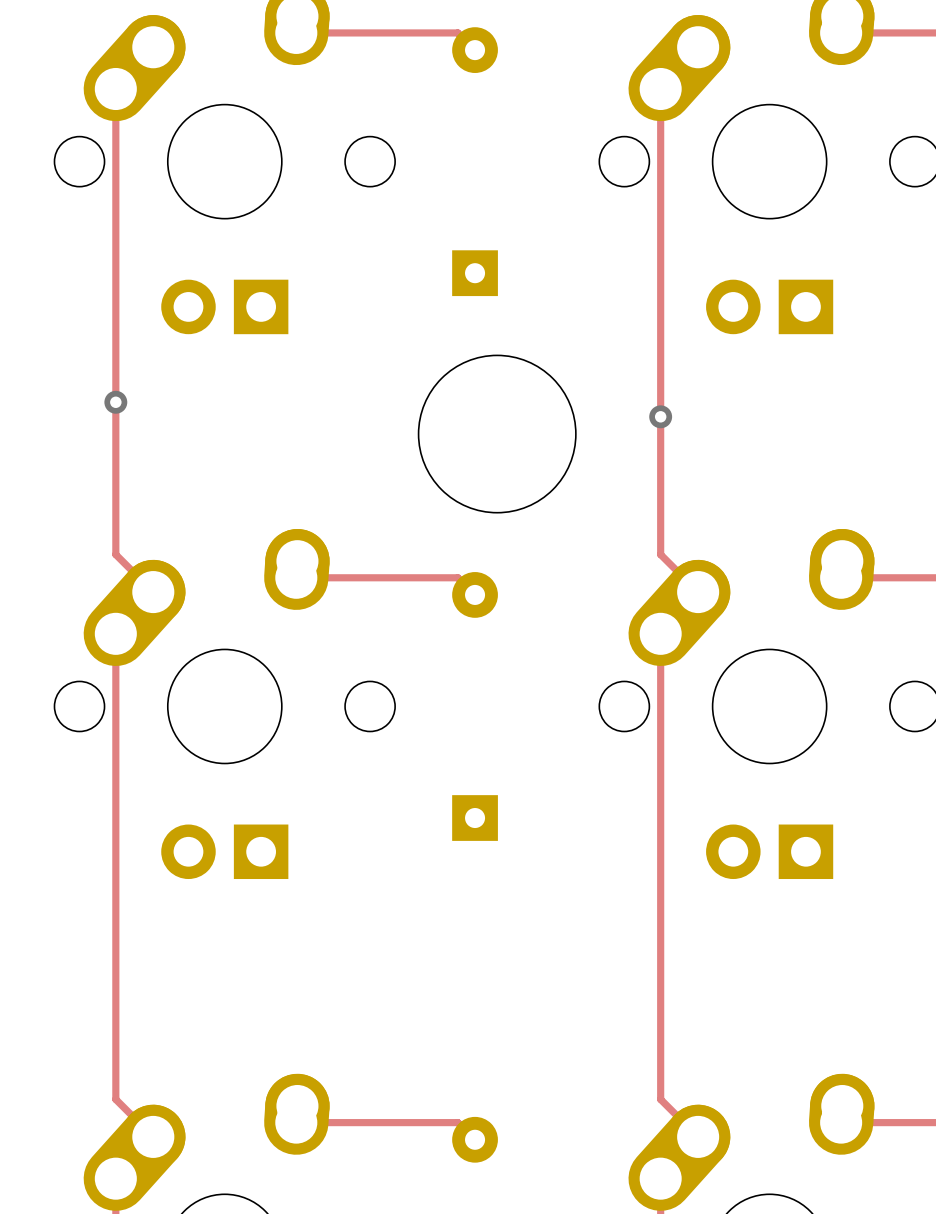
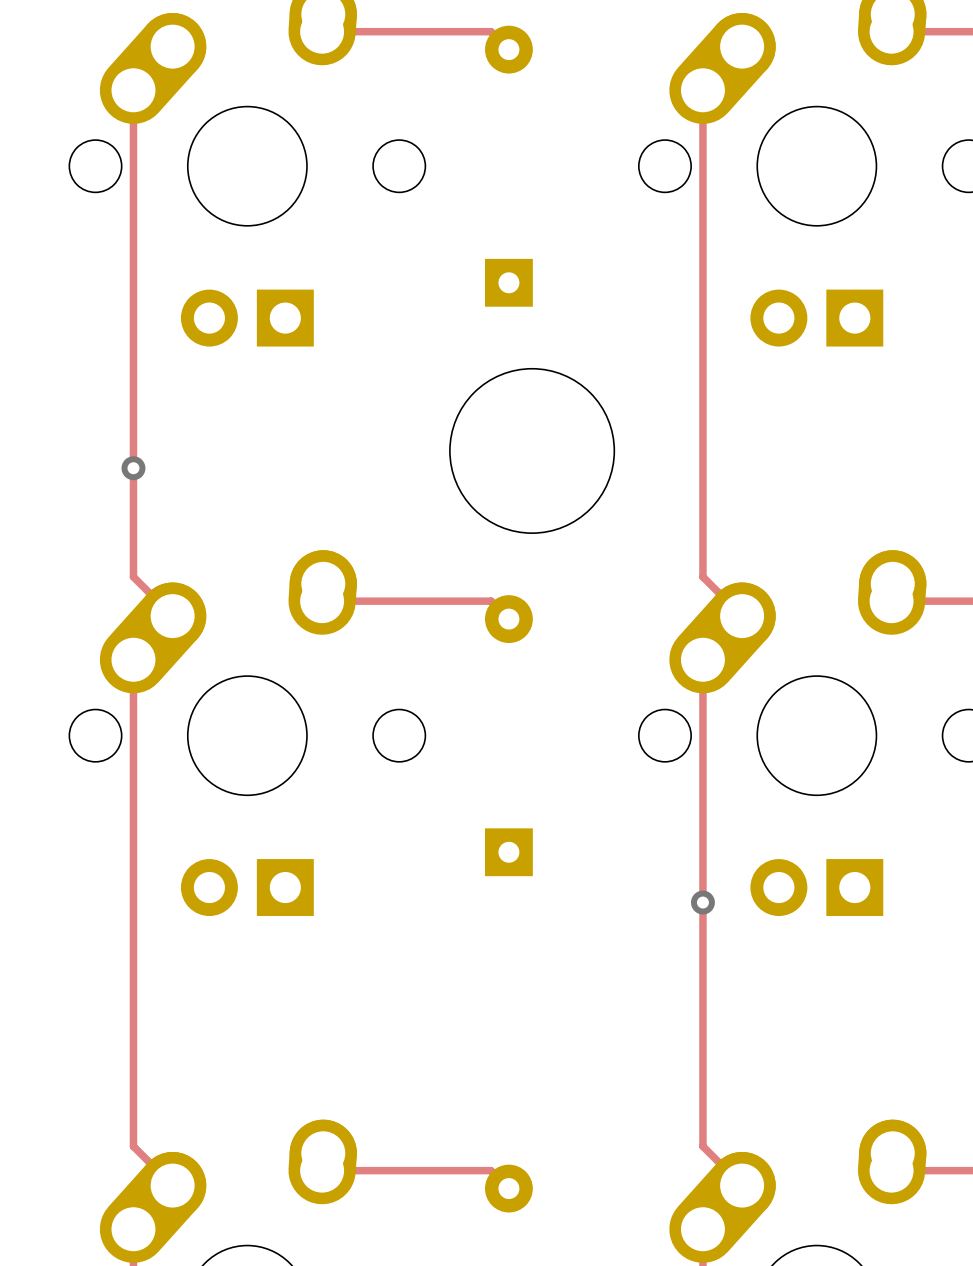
via position: (115, 402) -> (133, 468)
via: (660, 416) -> none
via: none -> (702, 902)

